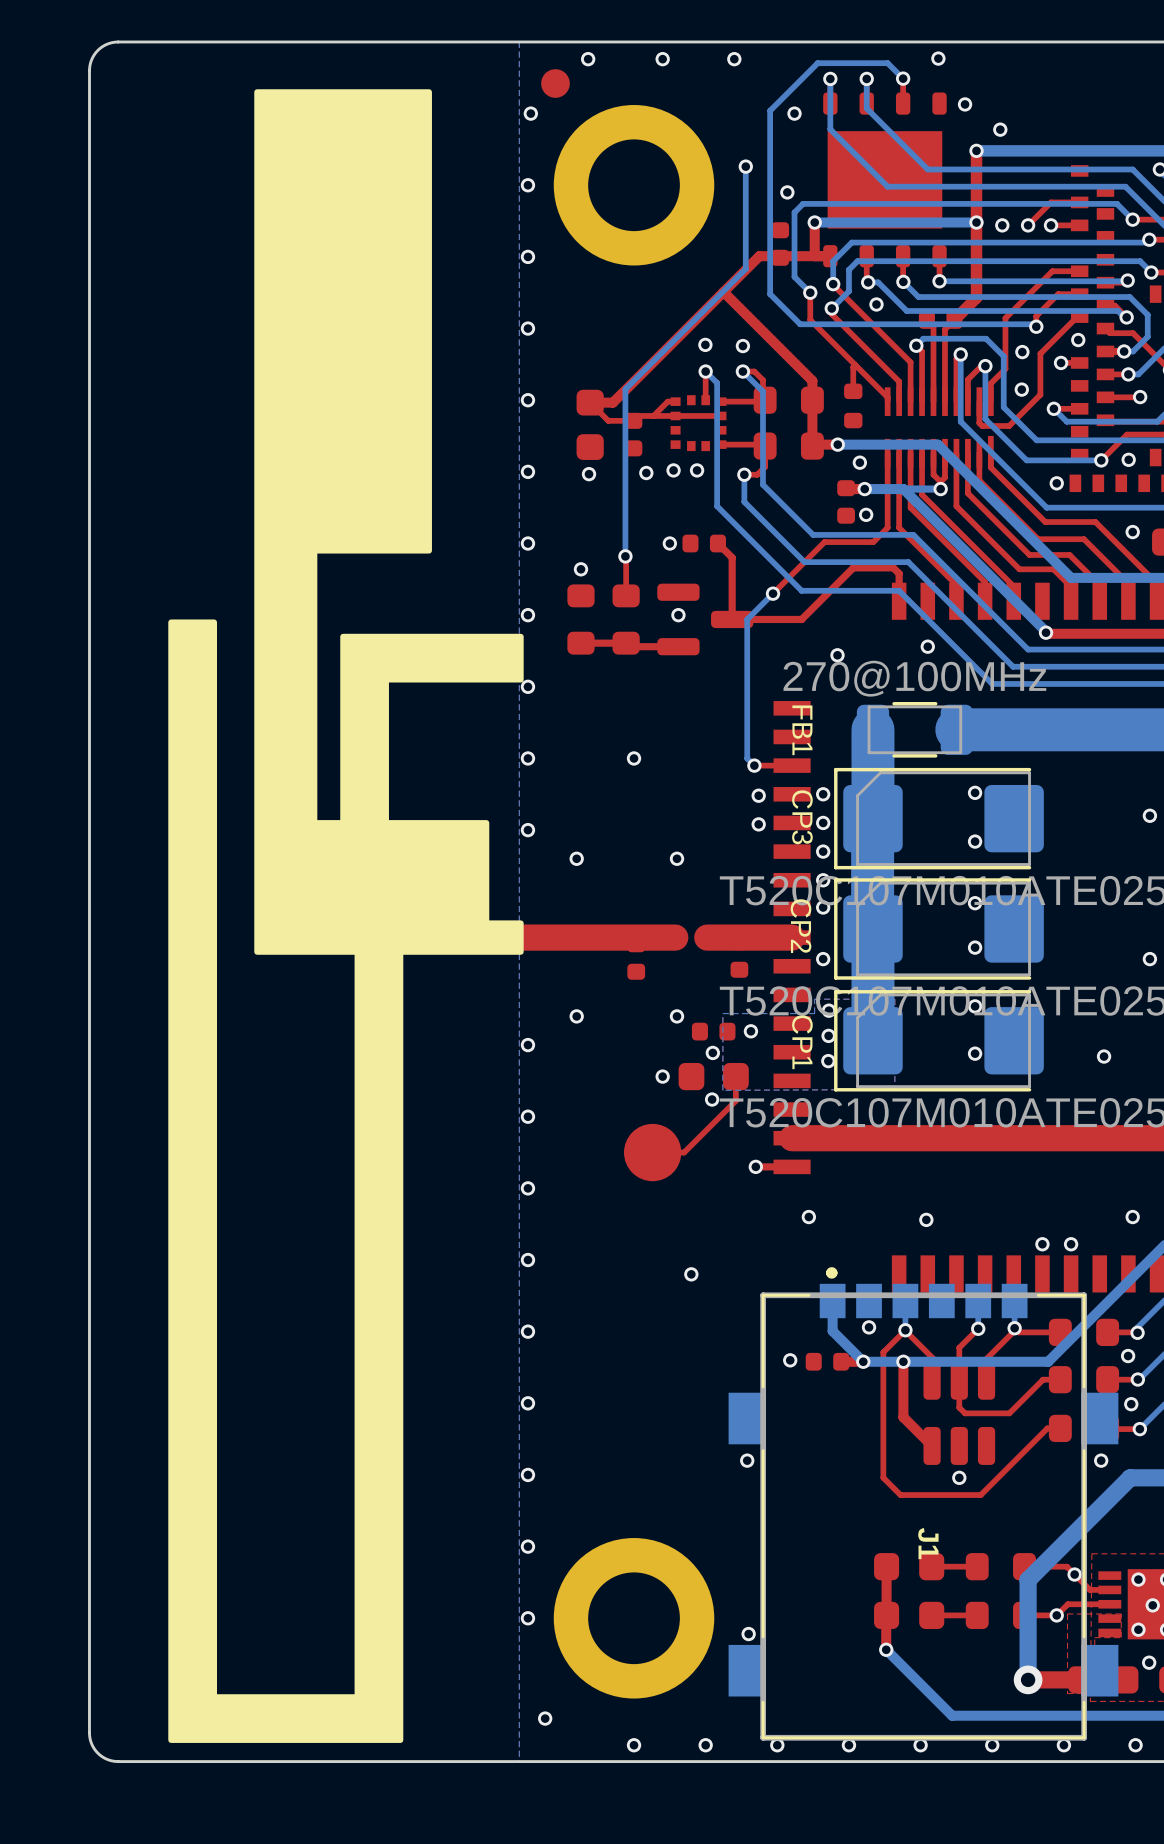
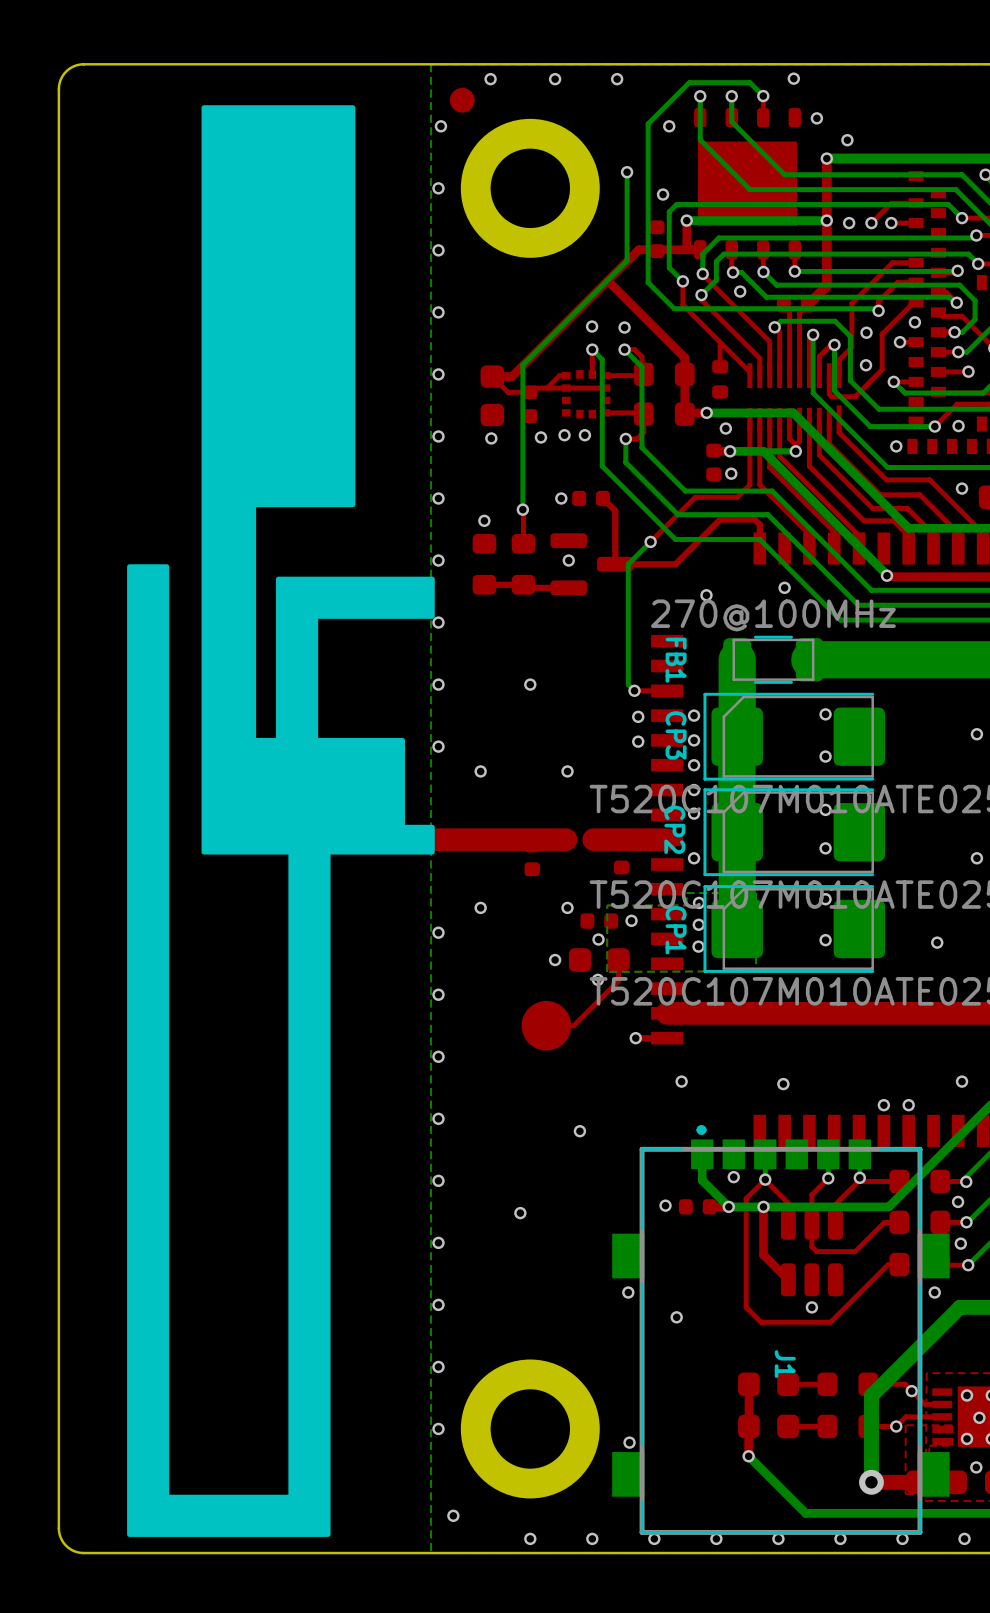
via: none -> (520, 1213)
via: none -> (676, 1317)

